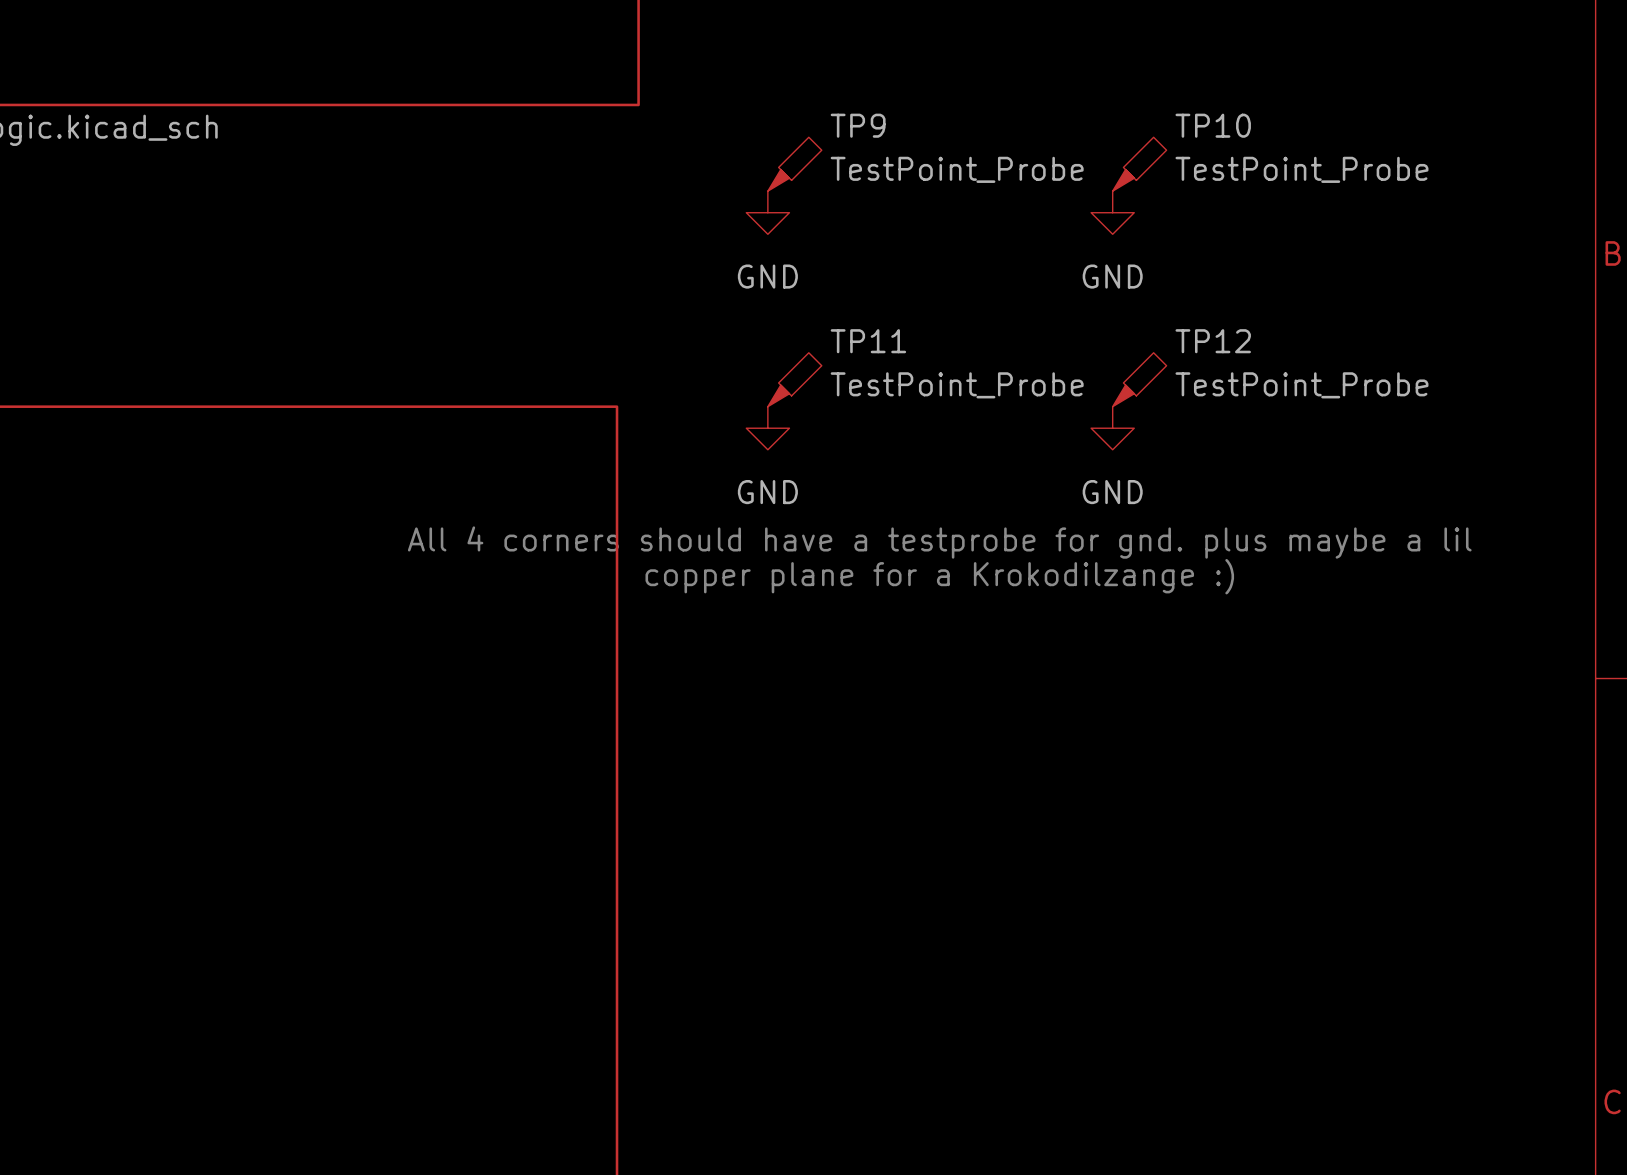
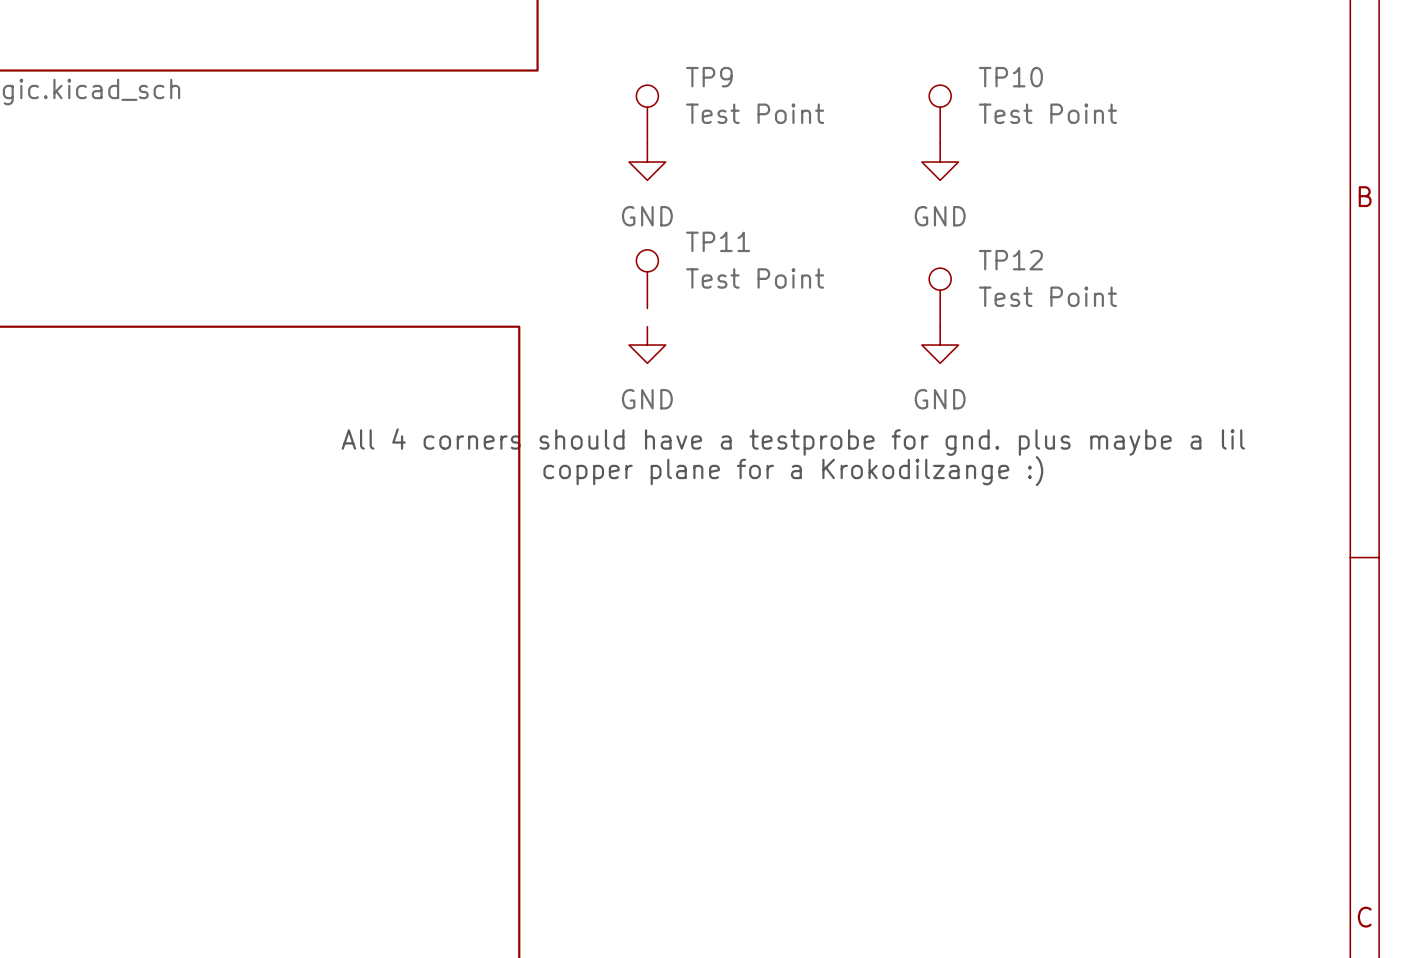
TP9 symbol: [767, 137, 822, 192] -> [636, 85, 659, 144]
TP10 symbol: [1112, 137, 1167, 192] -> [929, 85, 952, 144]
TP9 value: TestPoint_Probe (957, 169) -> Test Point (755, 113)
TP10 value: TestPoint_Probe (1301, 169) -> Test Point (1047, 113)
TP11 symbol: [767, 352, 822, 407] -> [636, 249, 659, 309]
TP12 symbol: [1112, 352, 1167, 407] -> [929, 268, 952, 327]
TP11 value: TestPoint_Probe (957, 385) -> Test Point (755, 278)
TP12 value: TestPoint_Probe (1301, 385) -> Test Point (1047, 296)

